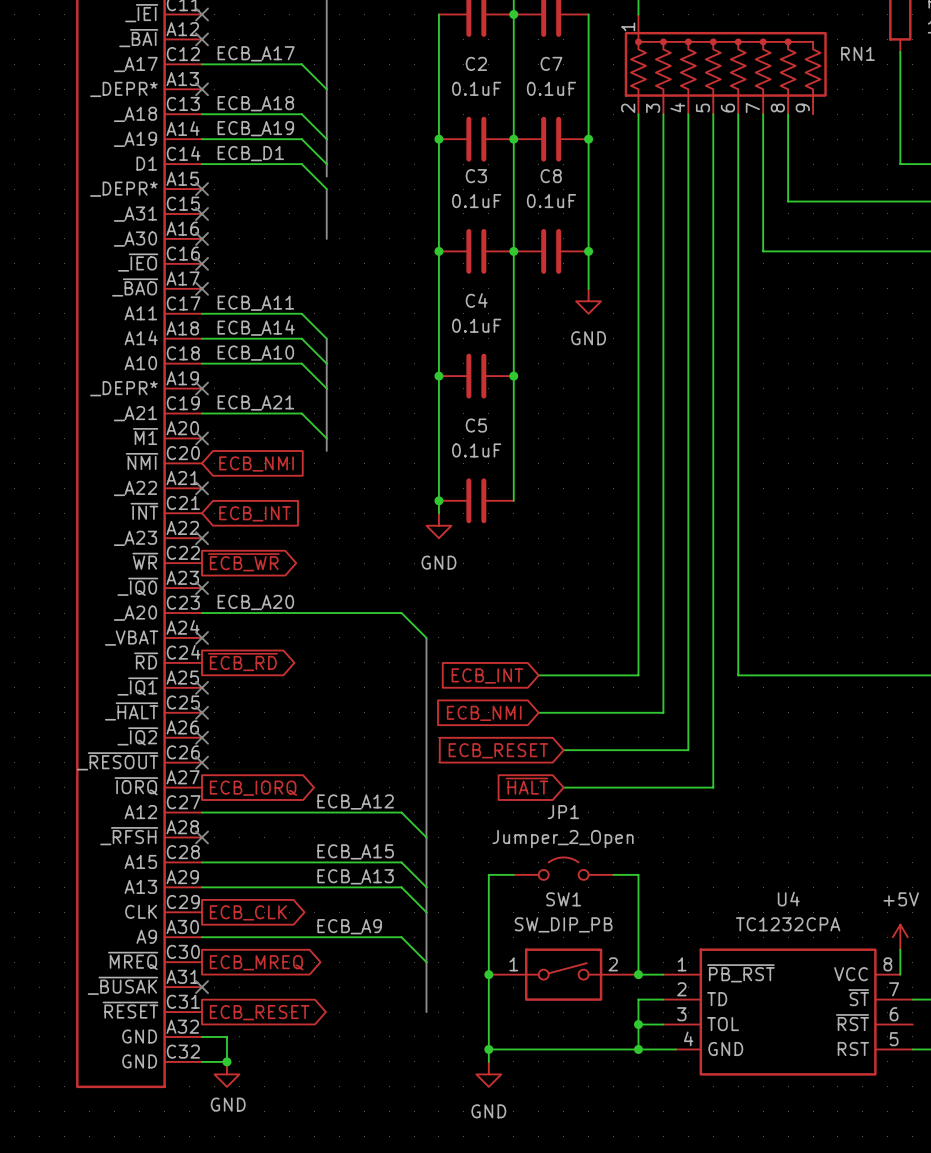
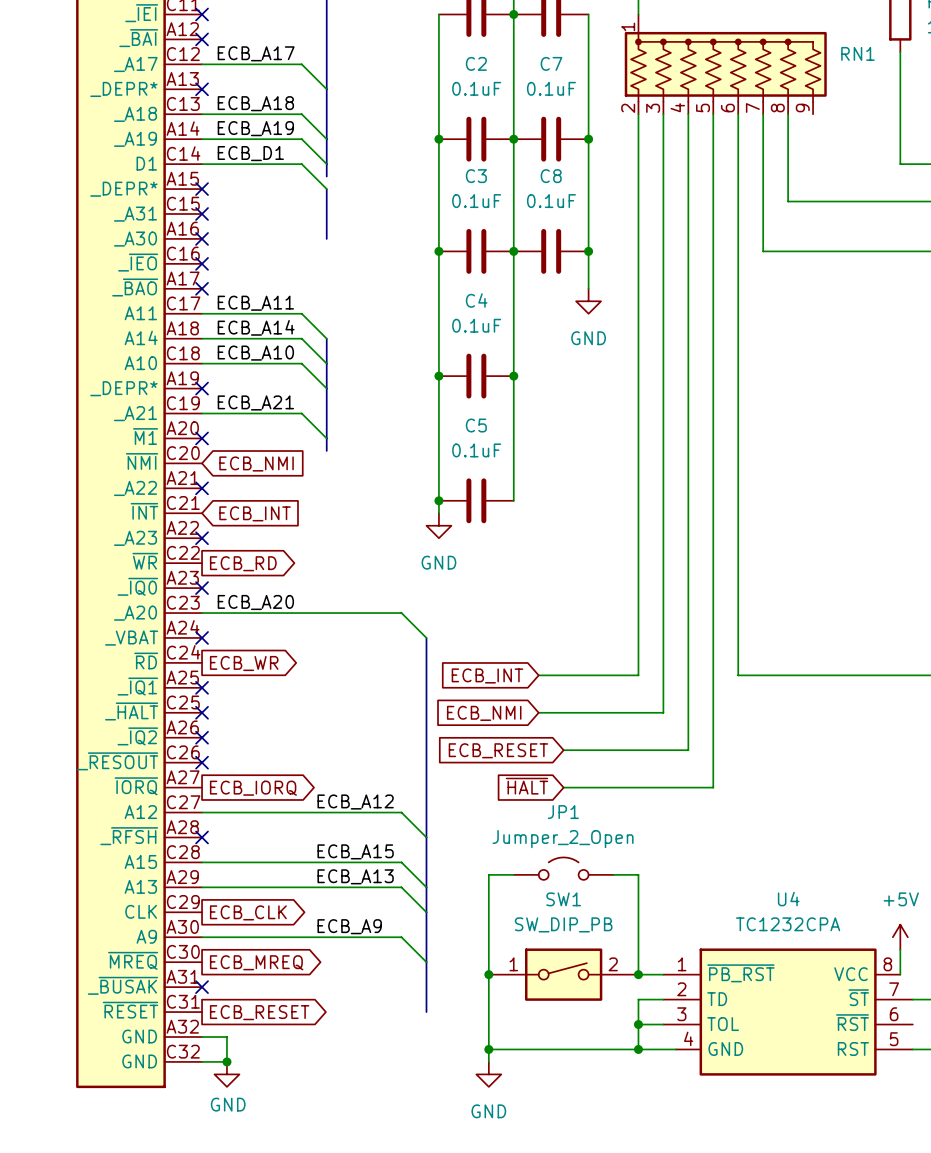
global label: ~{ECB_WR} (243, 562) -> ECB_RD (243, 563)
global label: ~{ECB_RD} (243, 662) -> ECB_WR (244, 663)

